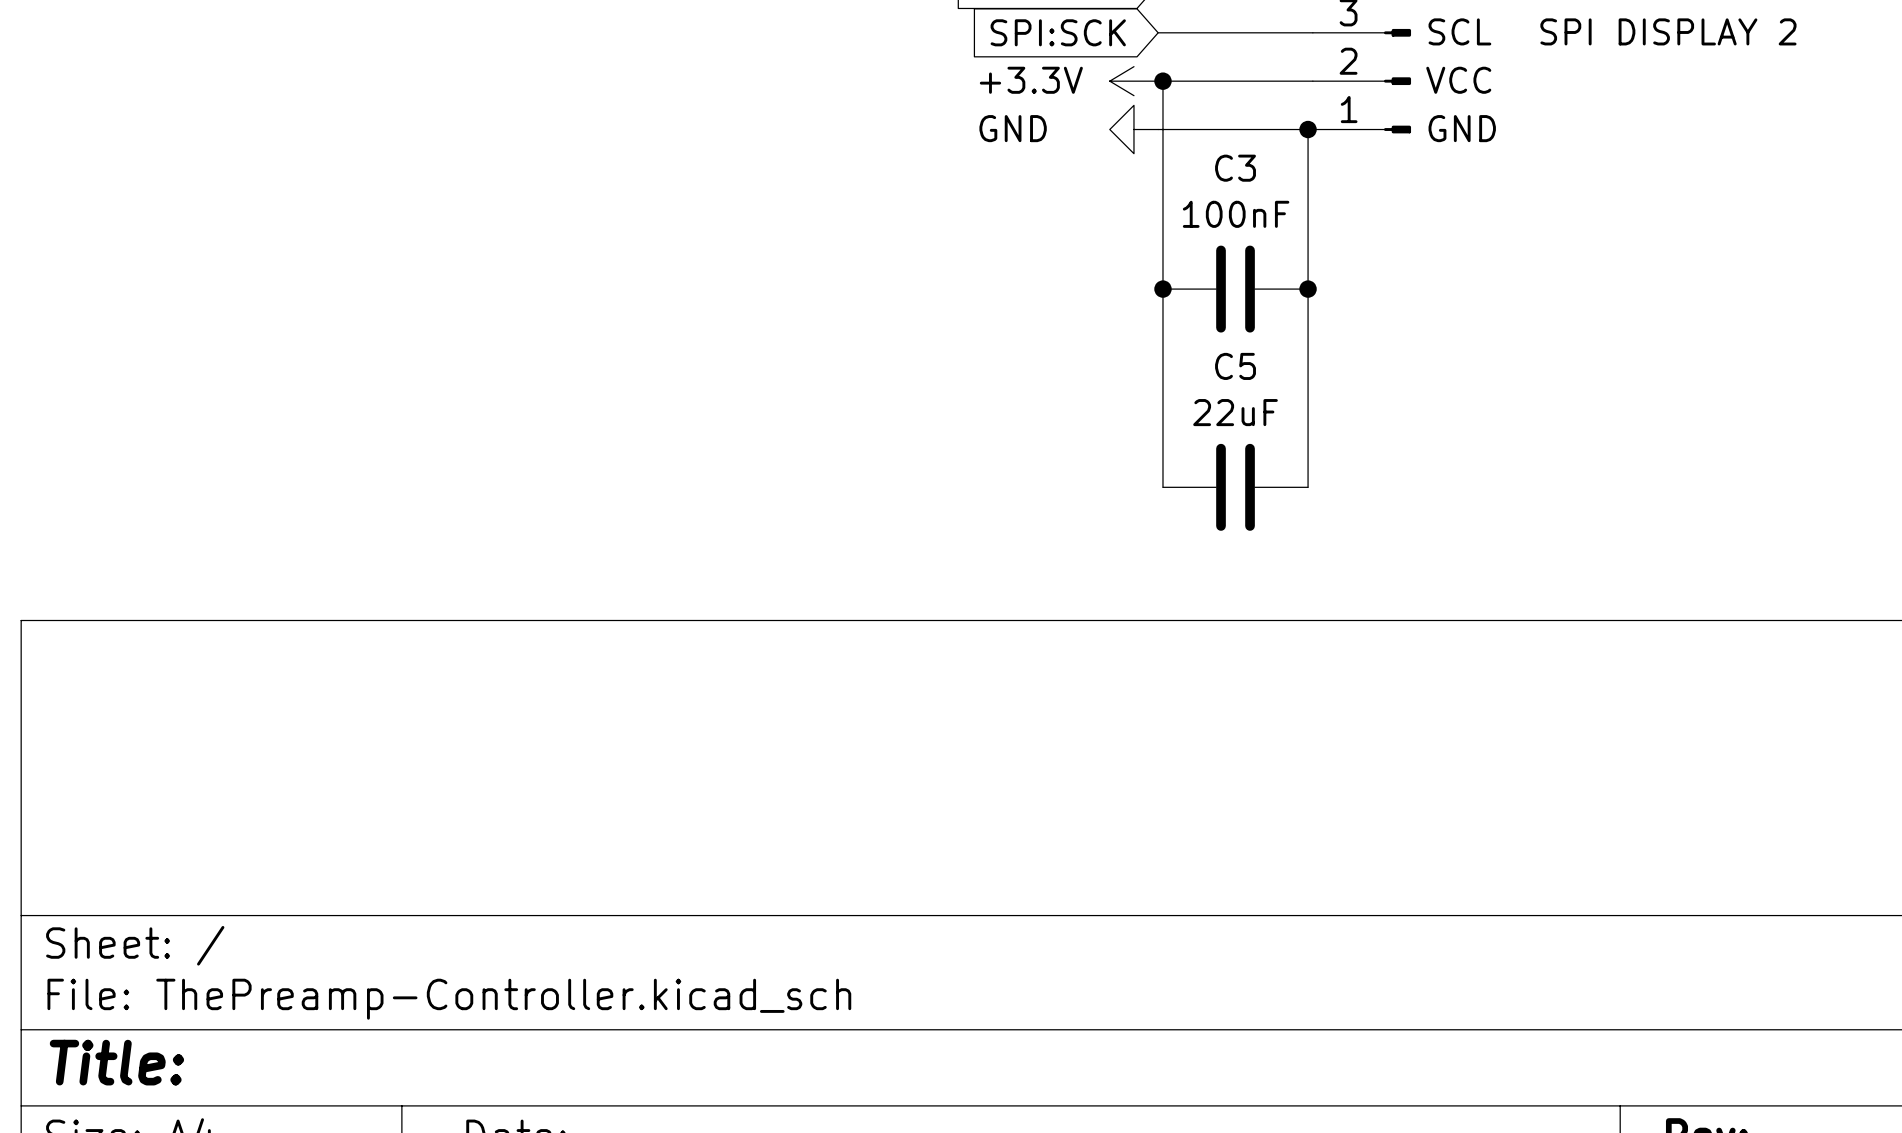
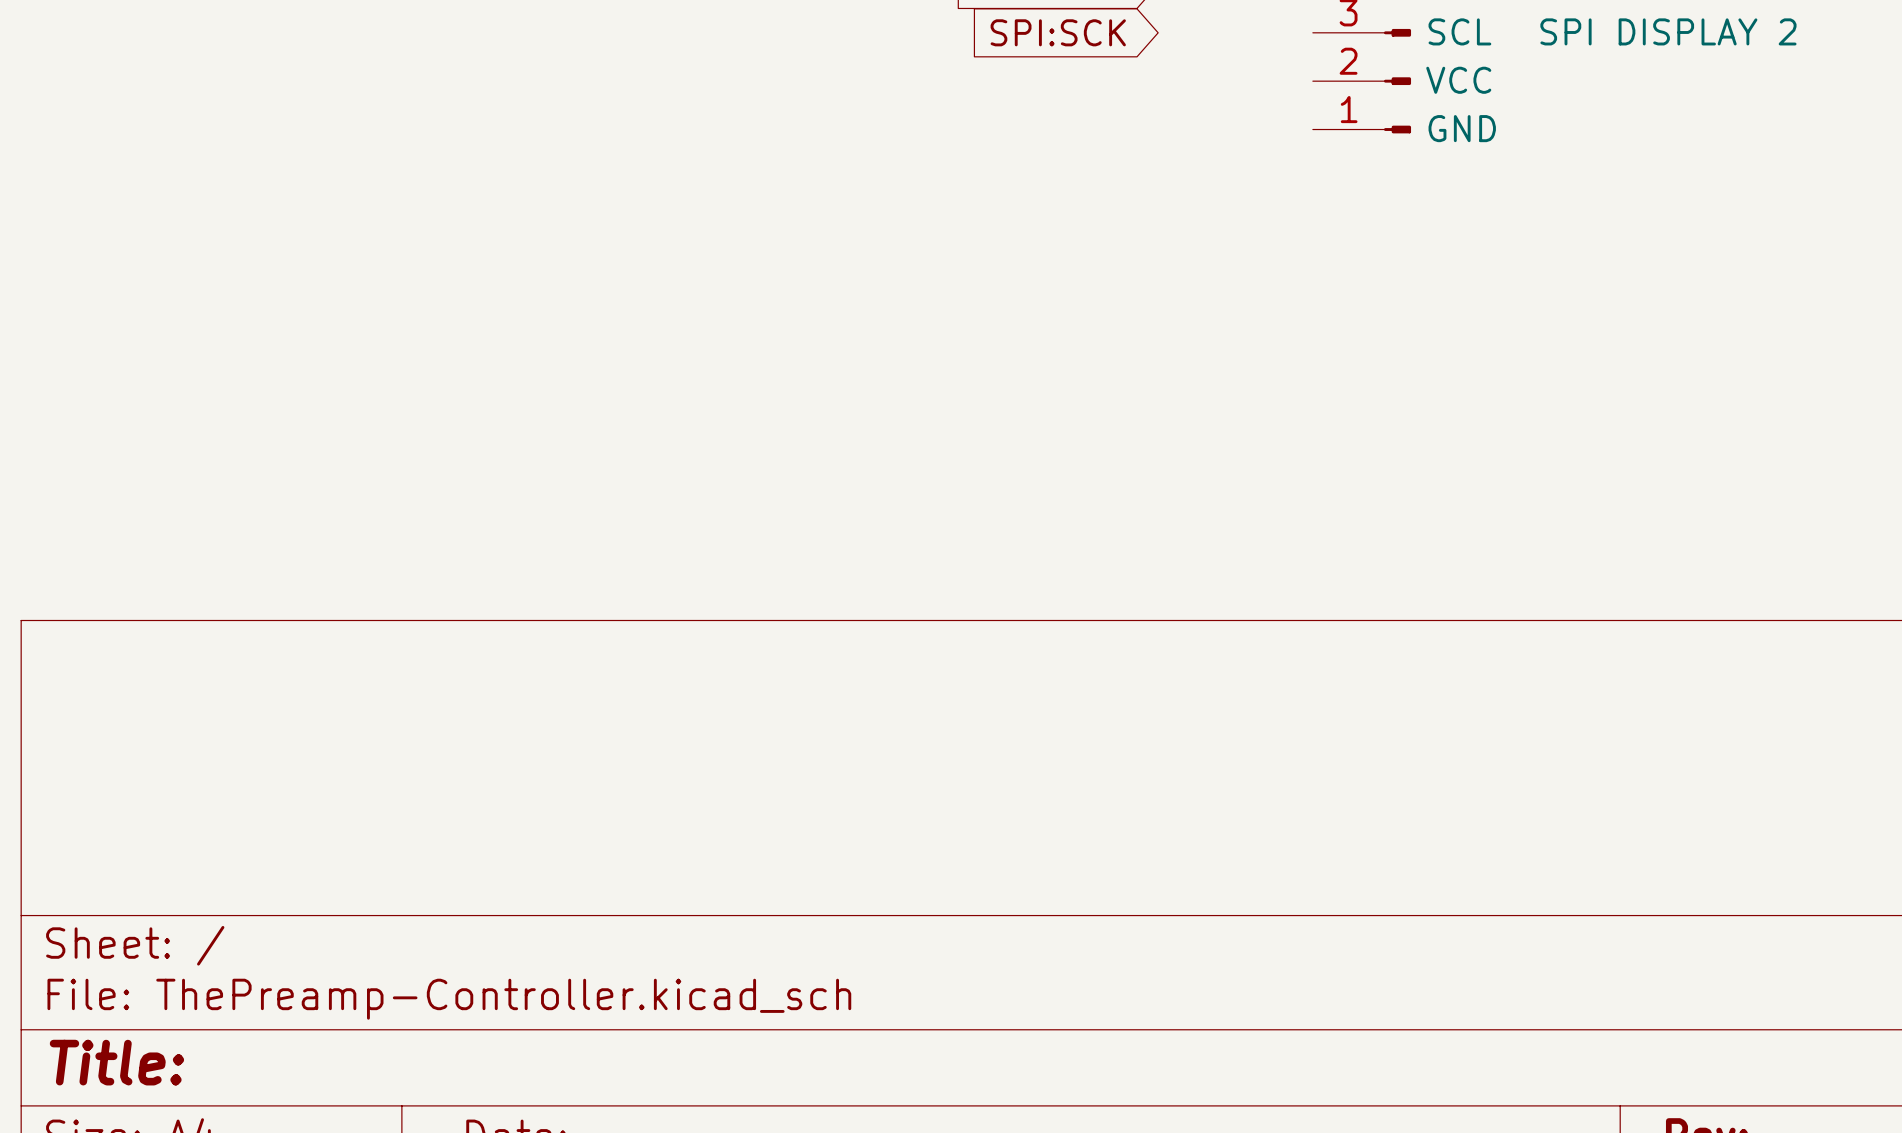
wire: (1158, 32) (1312, 32) -> none
power symbol: +3.3V (1133, 81) -> none
wire: (1158, 81) (1312, 81) -> none
wire: (1162, 81) (1162, 487) -> none
junction: (1162, 81) -> none
power symbol: GND (1133, 129) -> none
wire: (1158, 129) (1312, 129) -> none
wire: (1308, 129) (1308, 487) -> none
junction: (1308, 129) -> none
junction: (1162, 289) -> none
C3: 100nF (1235, 289) -> none
junction: (1308, 289) -> none
C5: 22uF (1235, 487) -> none

